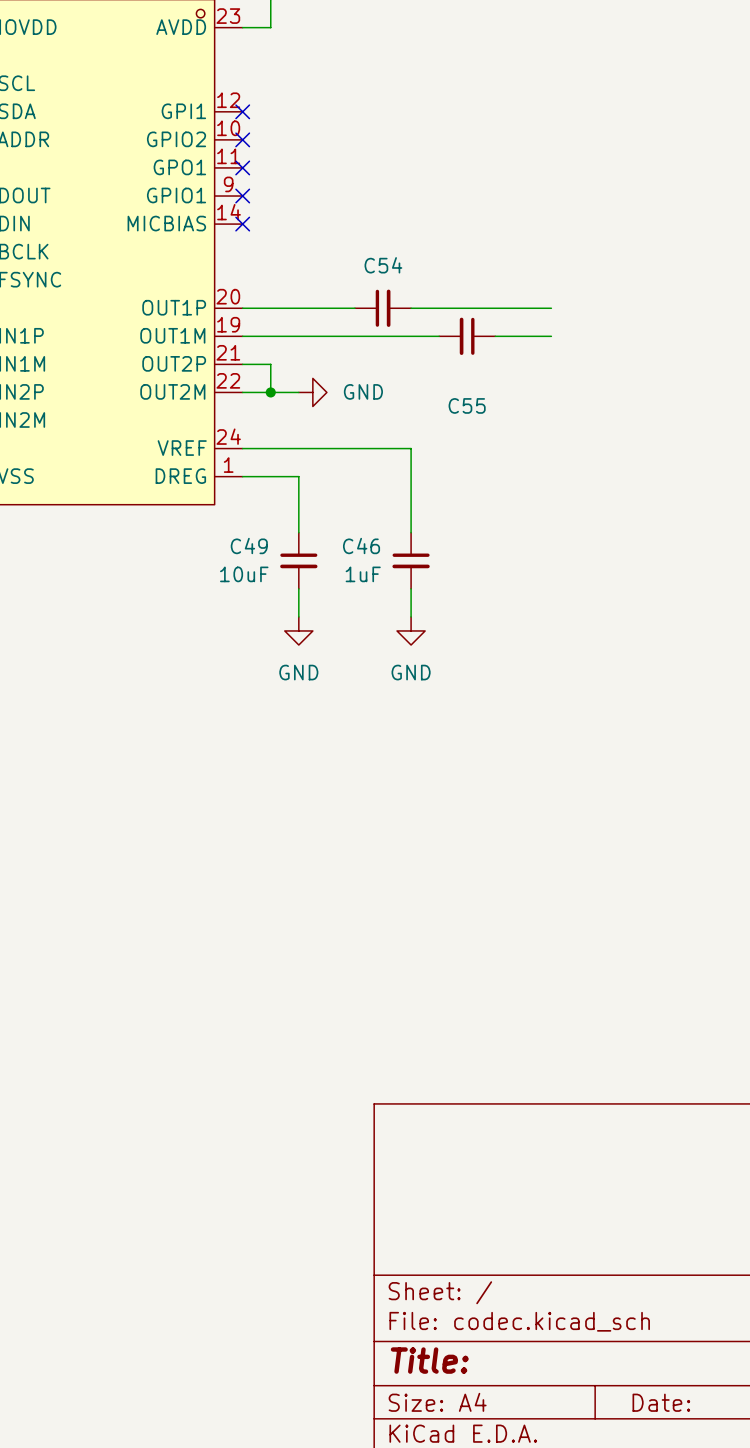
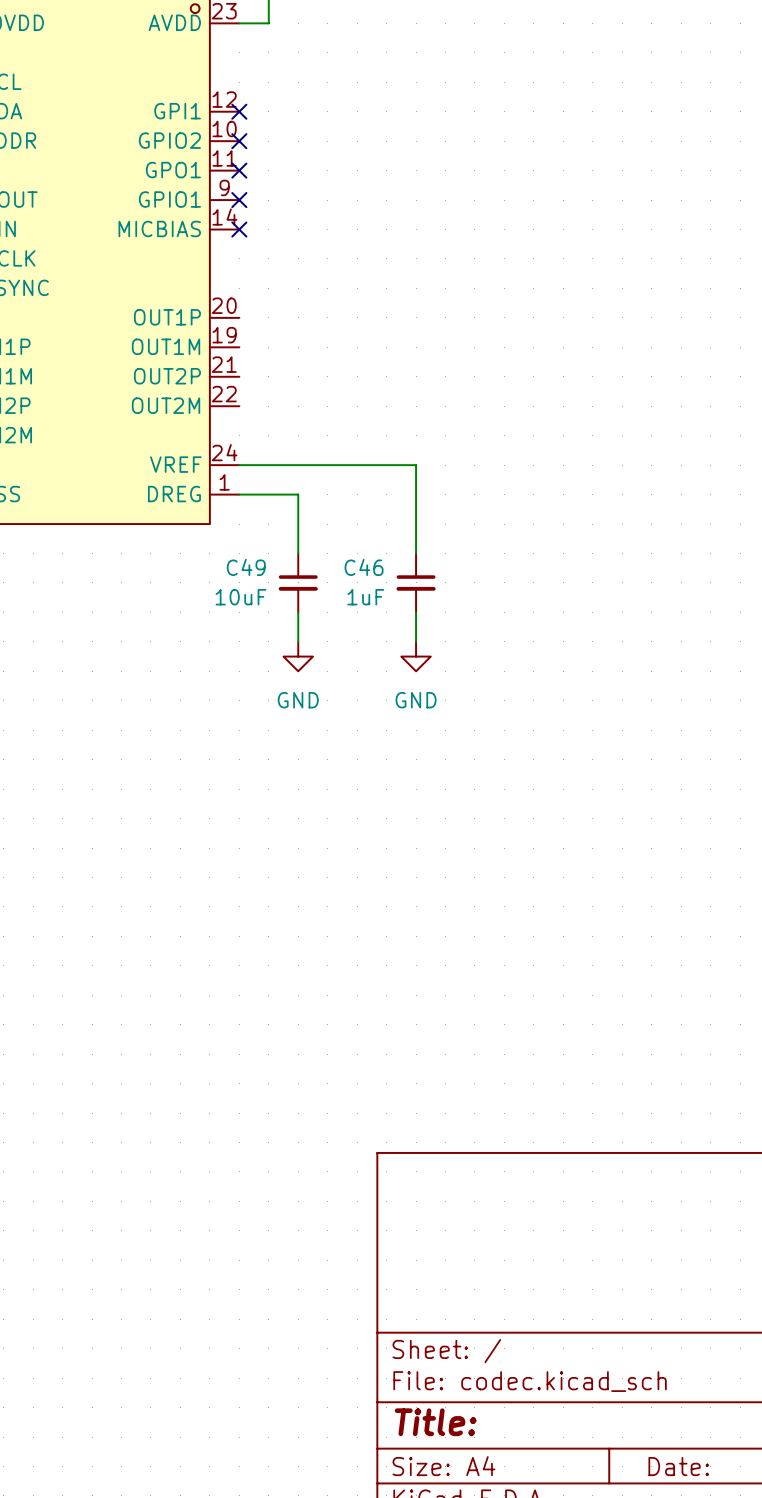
wire: (242, 308) (354, 308) -> none
C54: (383, 308) -> none
wire: (411, 308) (551, 308) -> none
wire: (242, 336) (439, 336) -> none
C55: (467, 336) -> none
wire: (495, 336) (551, 336) -> none
wire: (242, 364) (270, 364) (270, 392) -> none
wire: (242, 392) (298, 392) -> none
junction: (270, 392) -> none
power symbol: GND (312, 392) -> none

